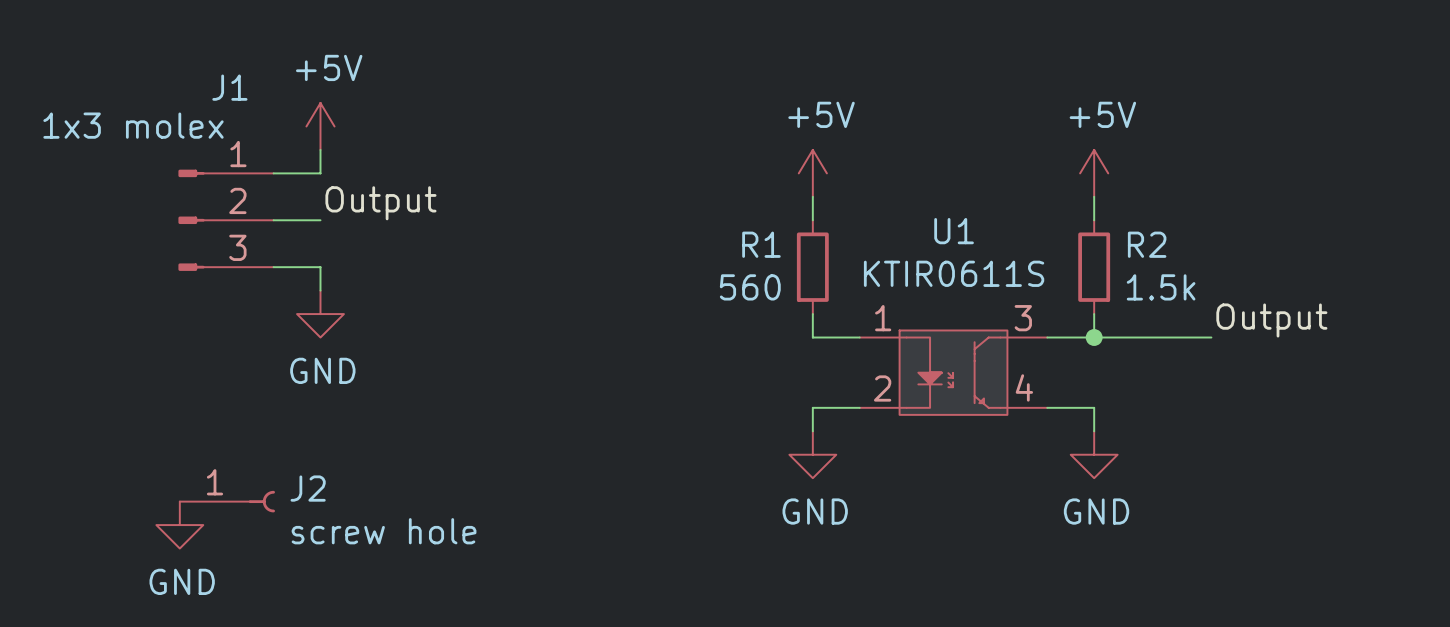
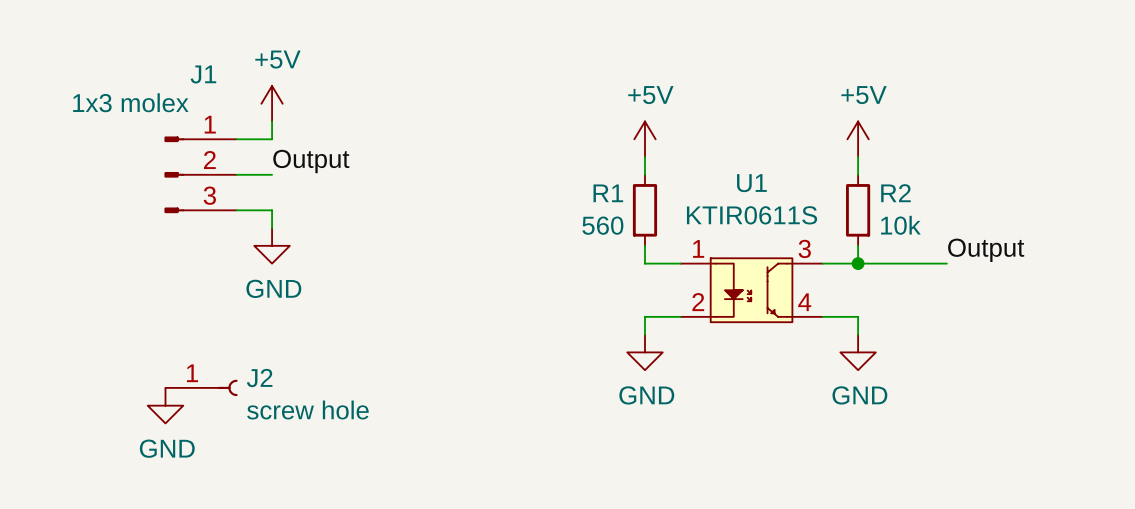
R2 value: 1.5k (1161, 287) -> 10k (900, 225)

